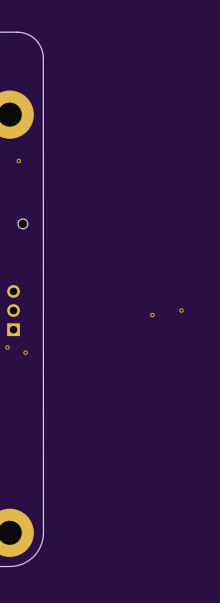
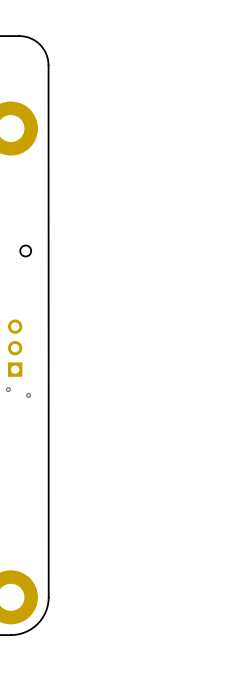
via: (18, 160) -> none
via: (181, 310) -> none
via: (152, 315) -> none

